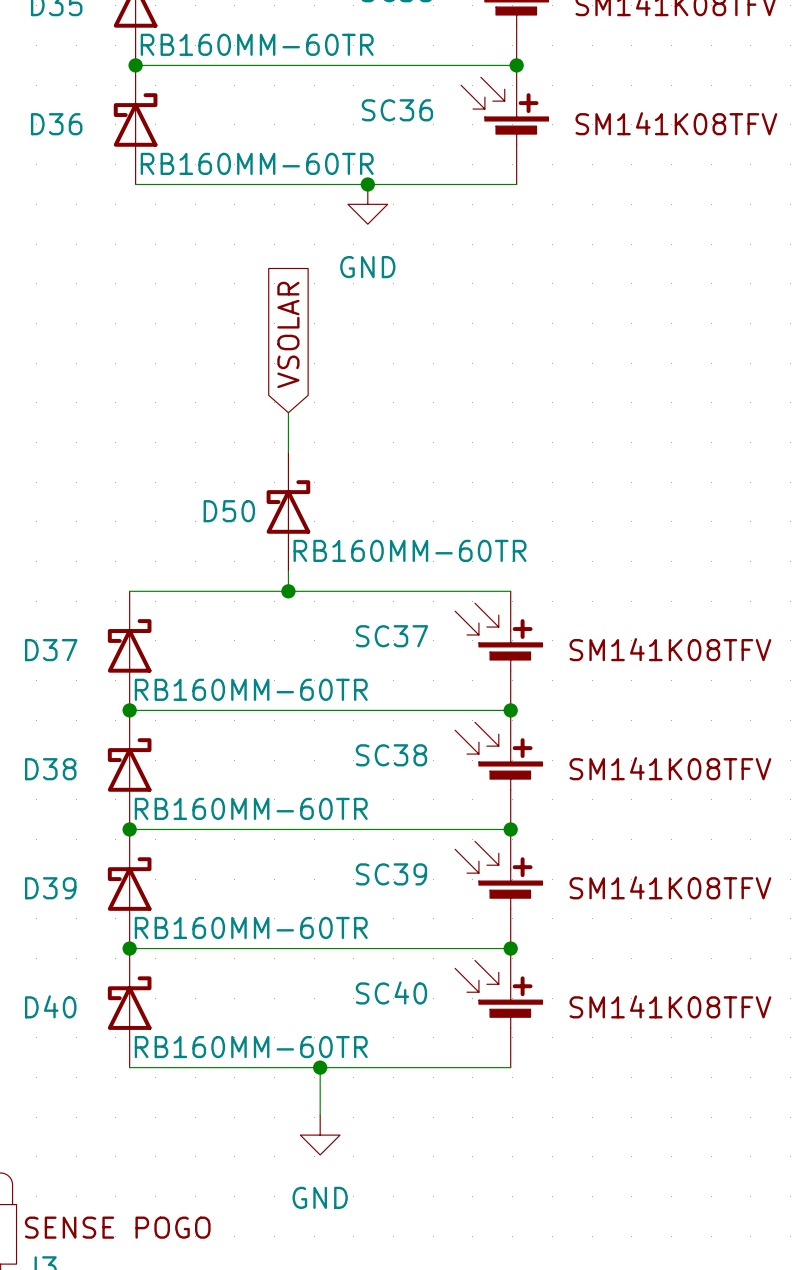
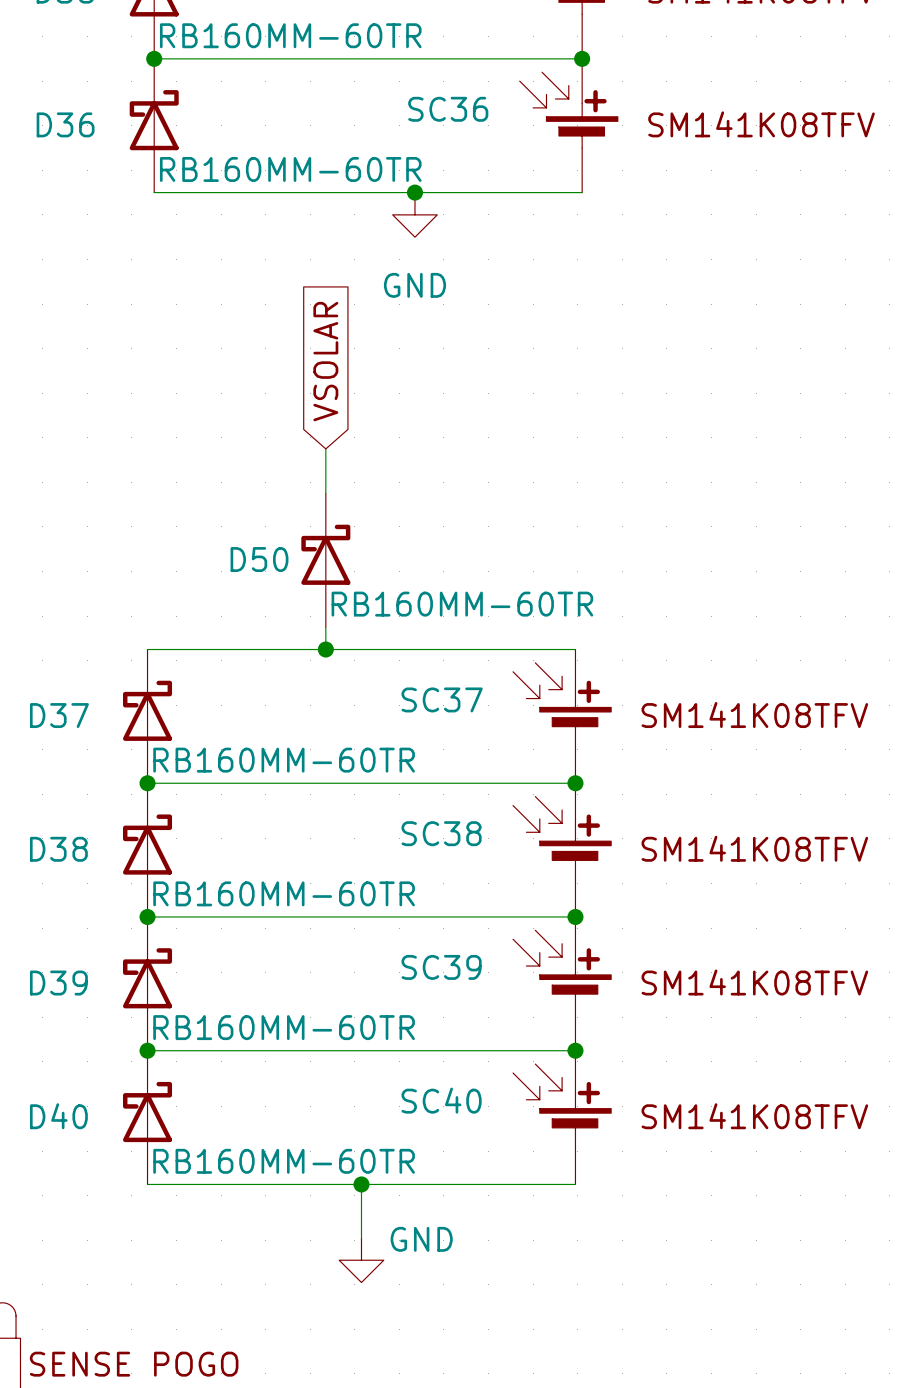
power symbol text position: GND (320, 1197) -> GND (421, 1239)

